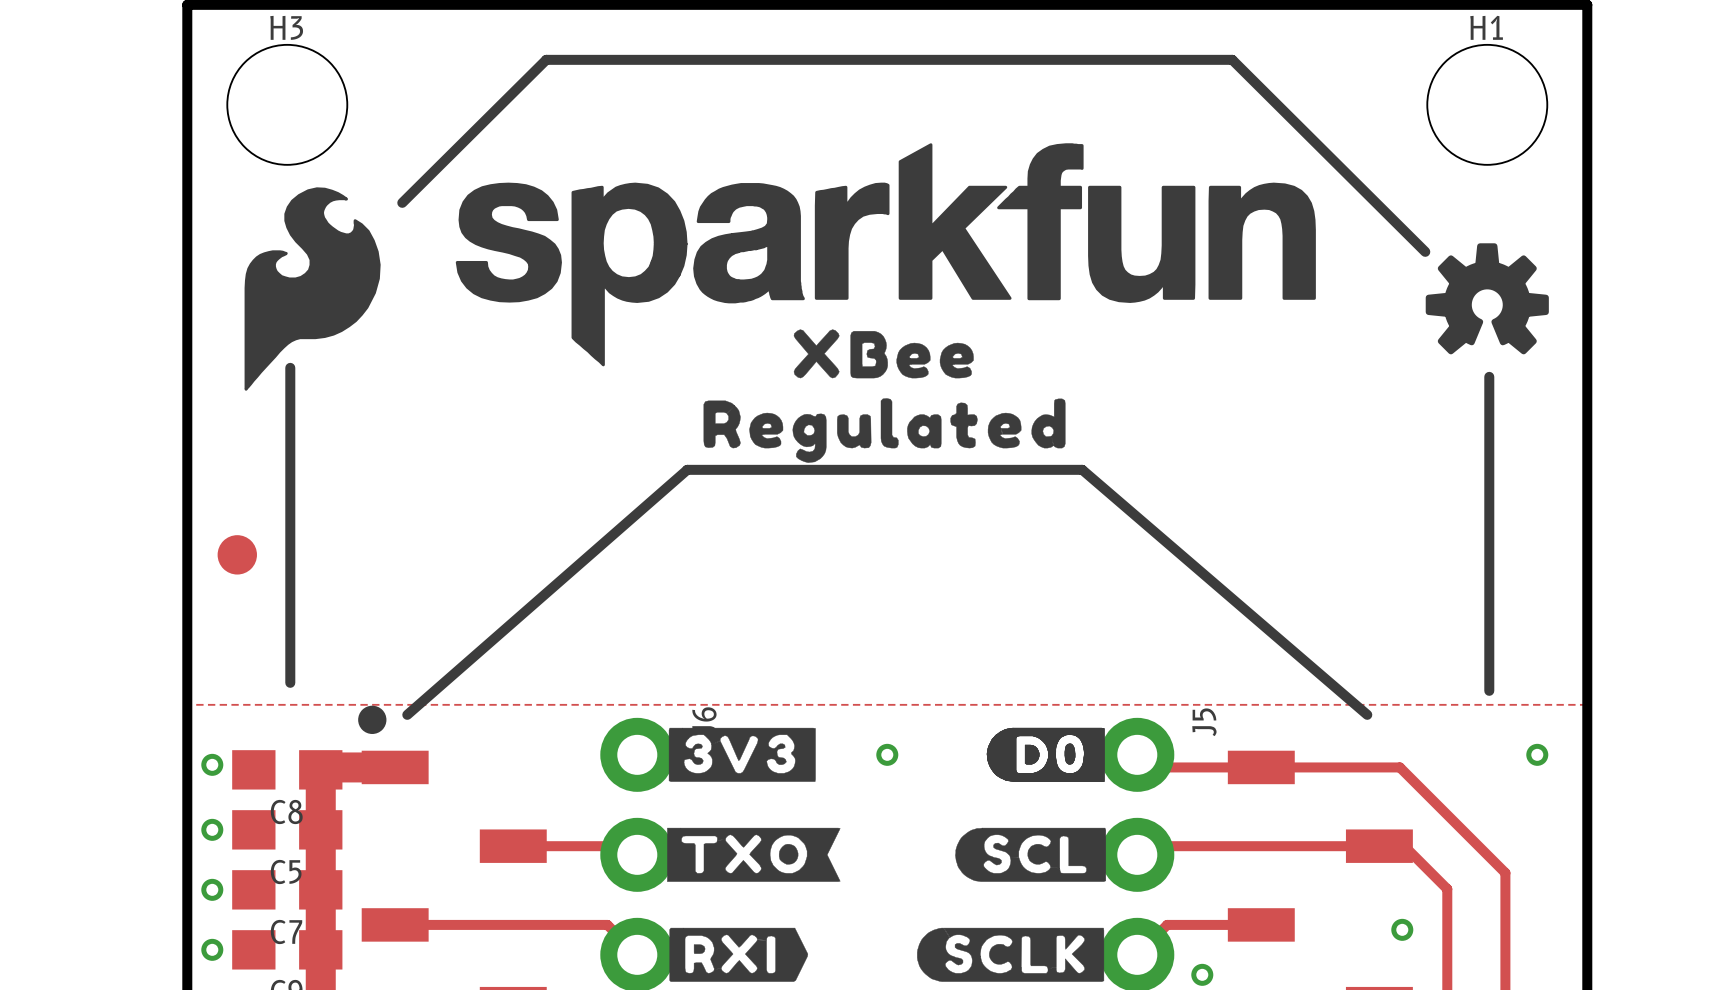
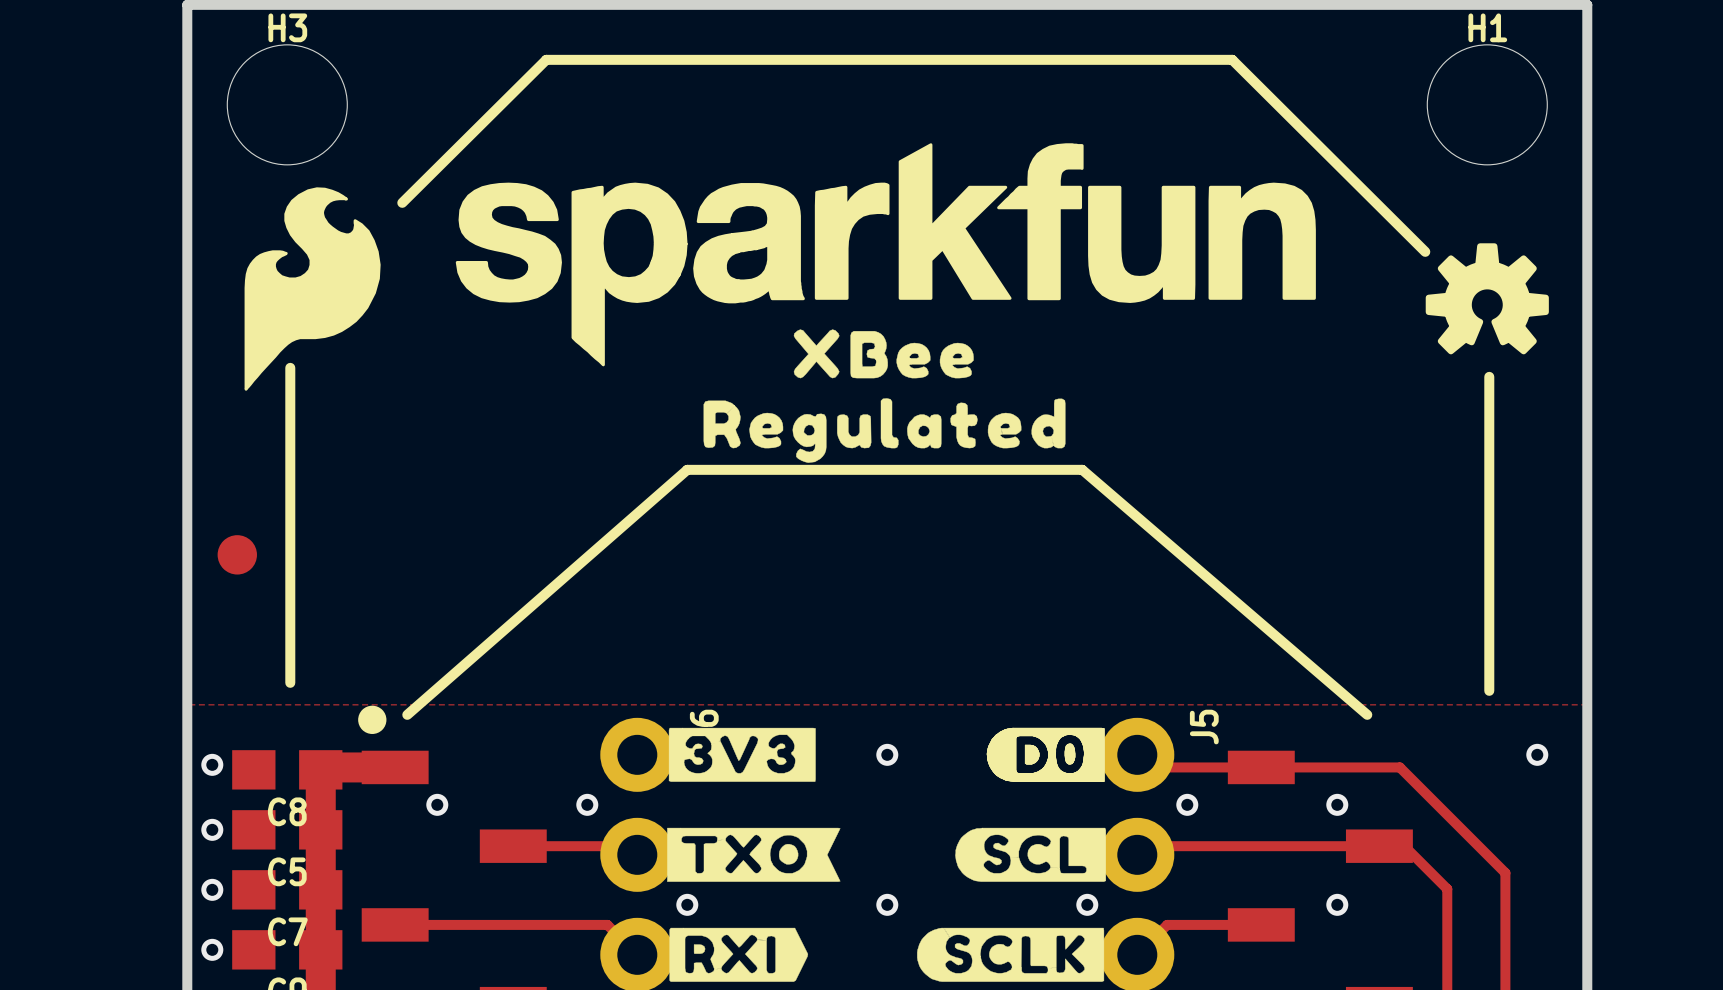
via: none -> (437, 804)
via: none -> (587, 804)
via: none -> (1187, 804)
via: none -> (1337, 804)
via: none -> (687, 904)
via: none -> (887, 904)
via: none -> (1087, 904)
via position: (1402, 929) -> (1337, 904)
via: (1202, 974) -> none

